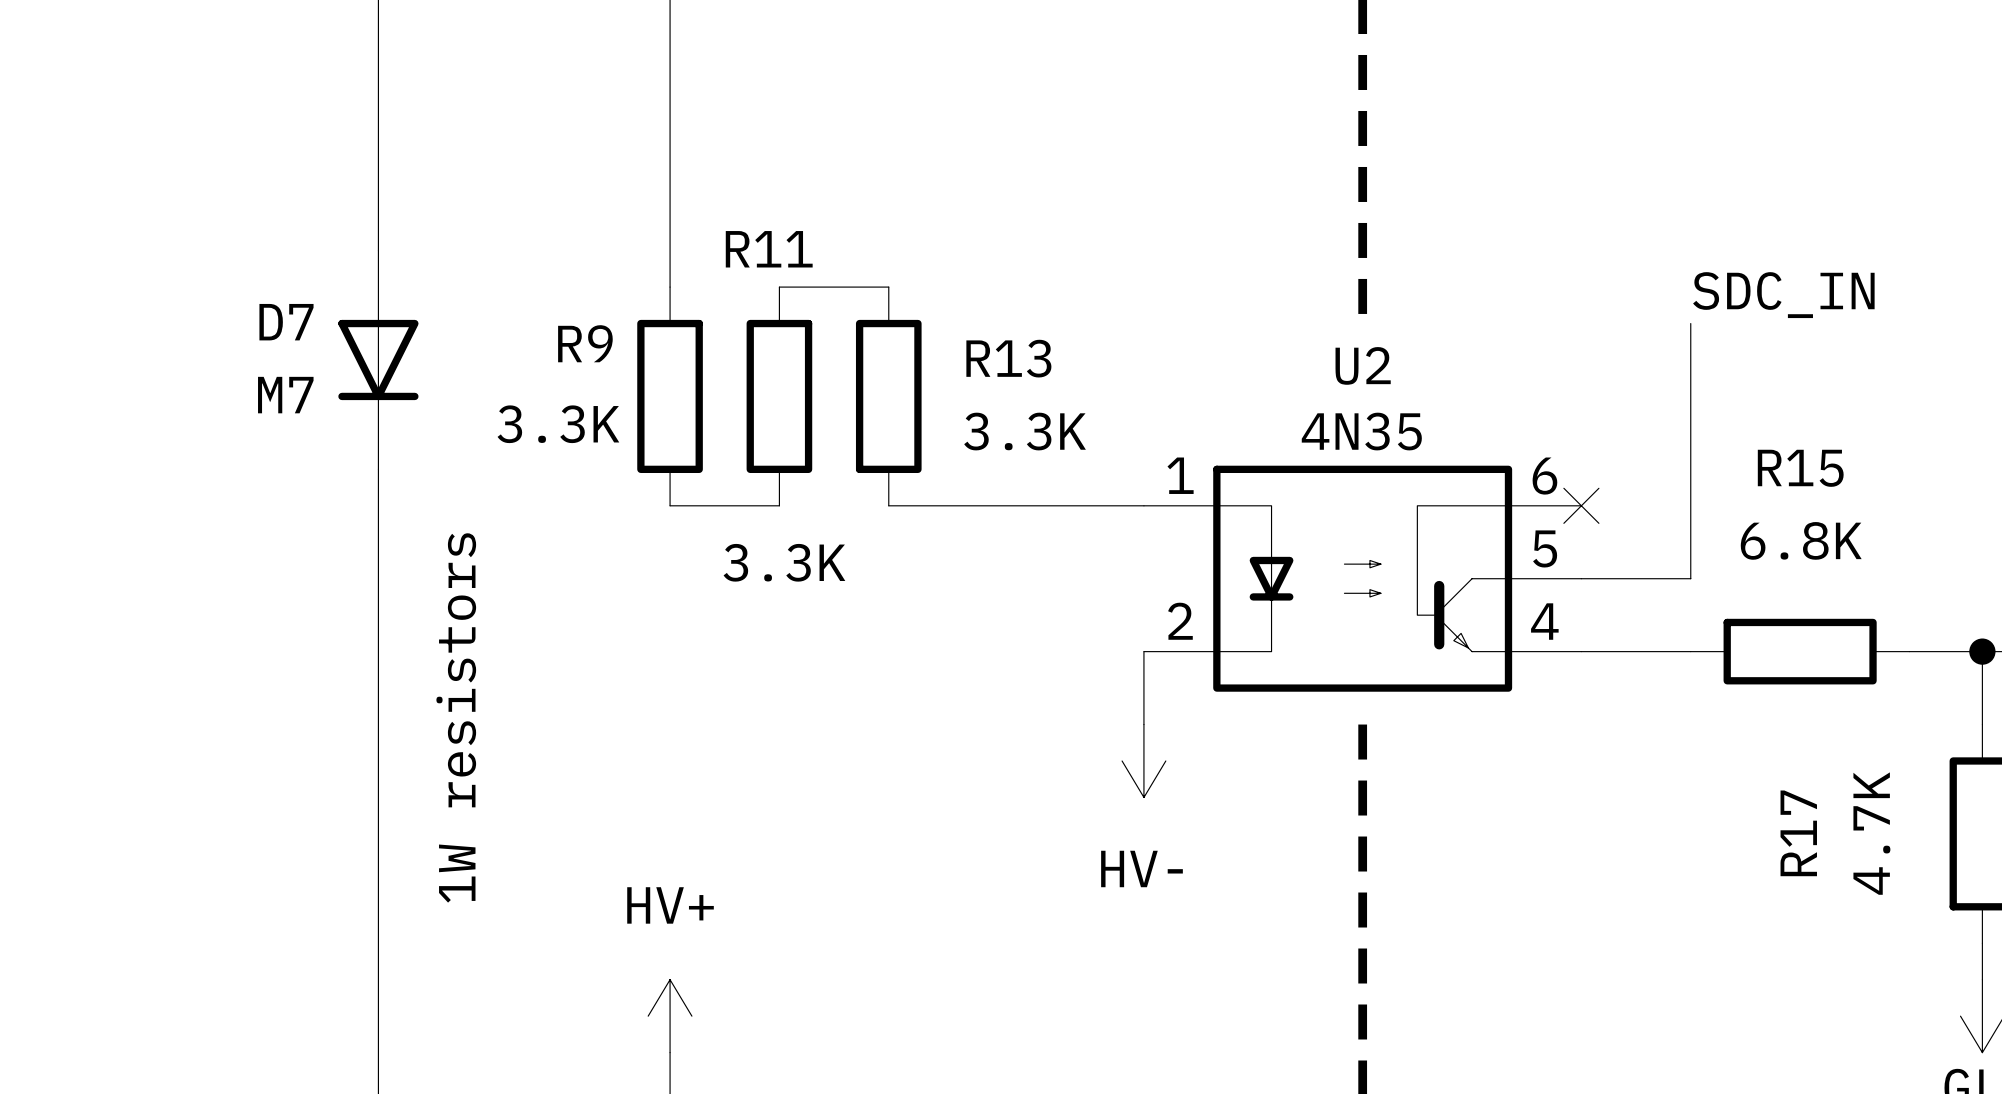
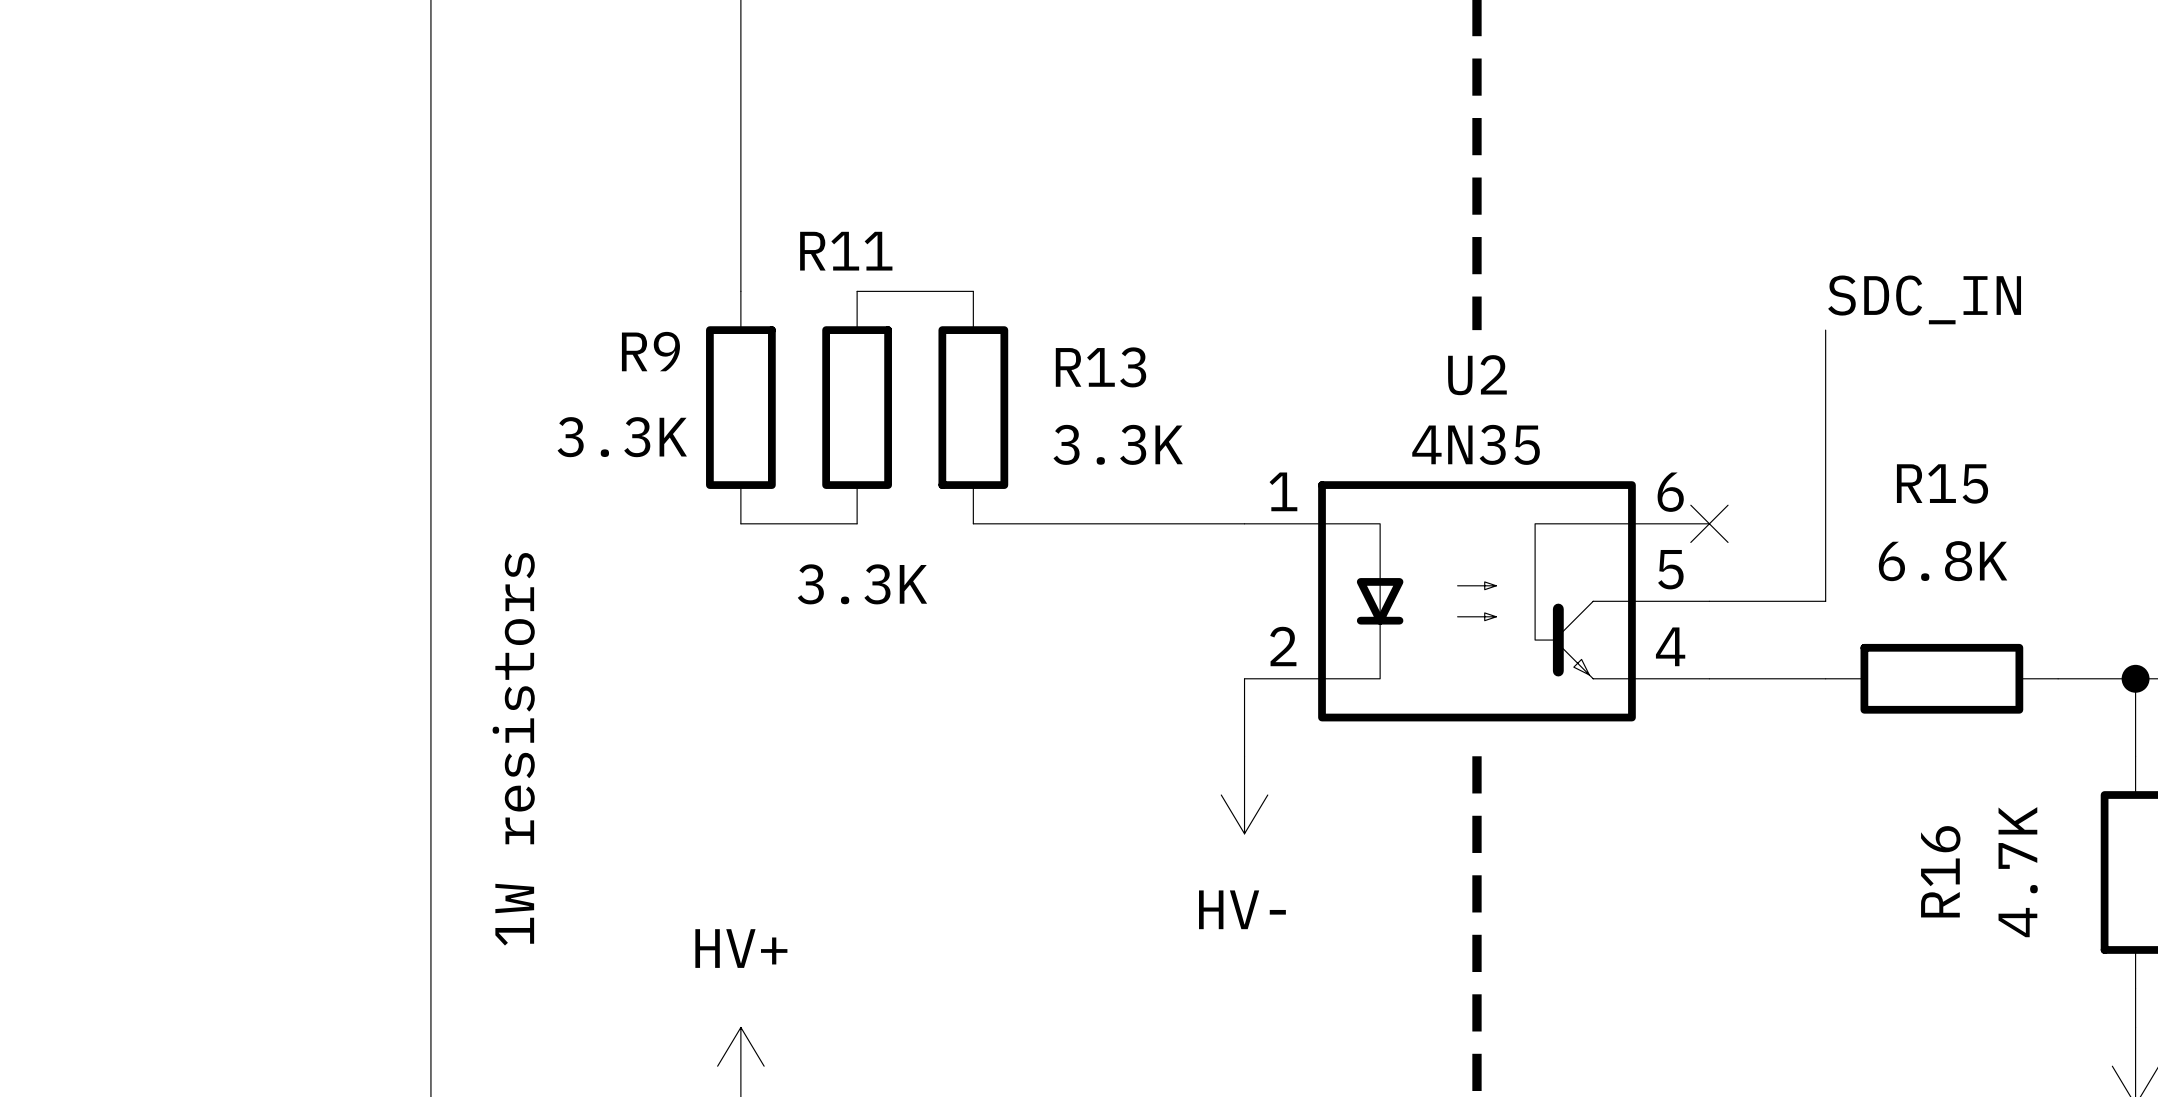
D7: M7 (378, 359) -> none
R17 name: R17 (1798, 833) -> R16 (1940, 871)

